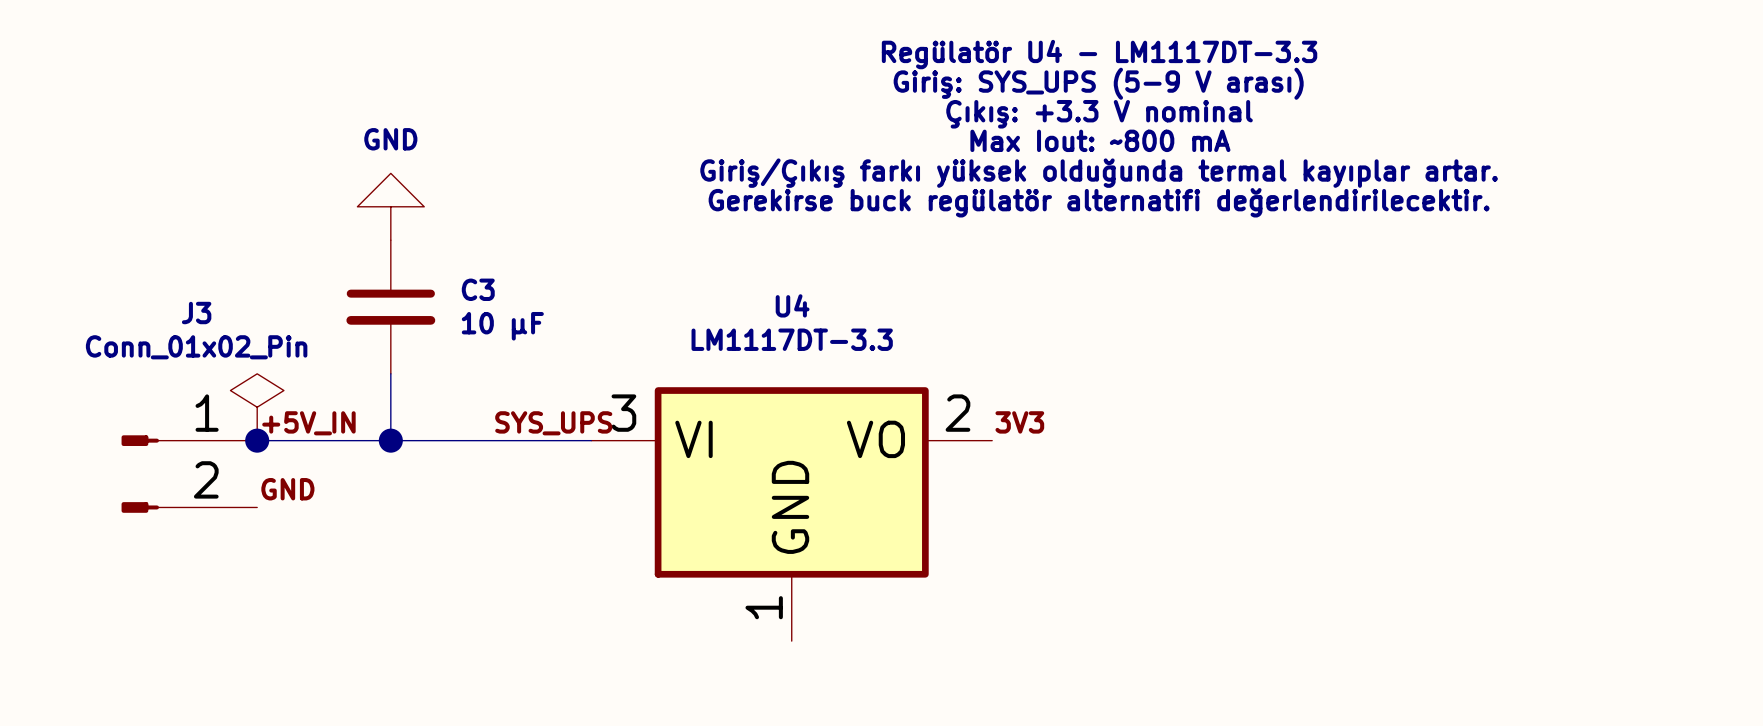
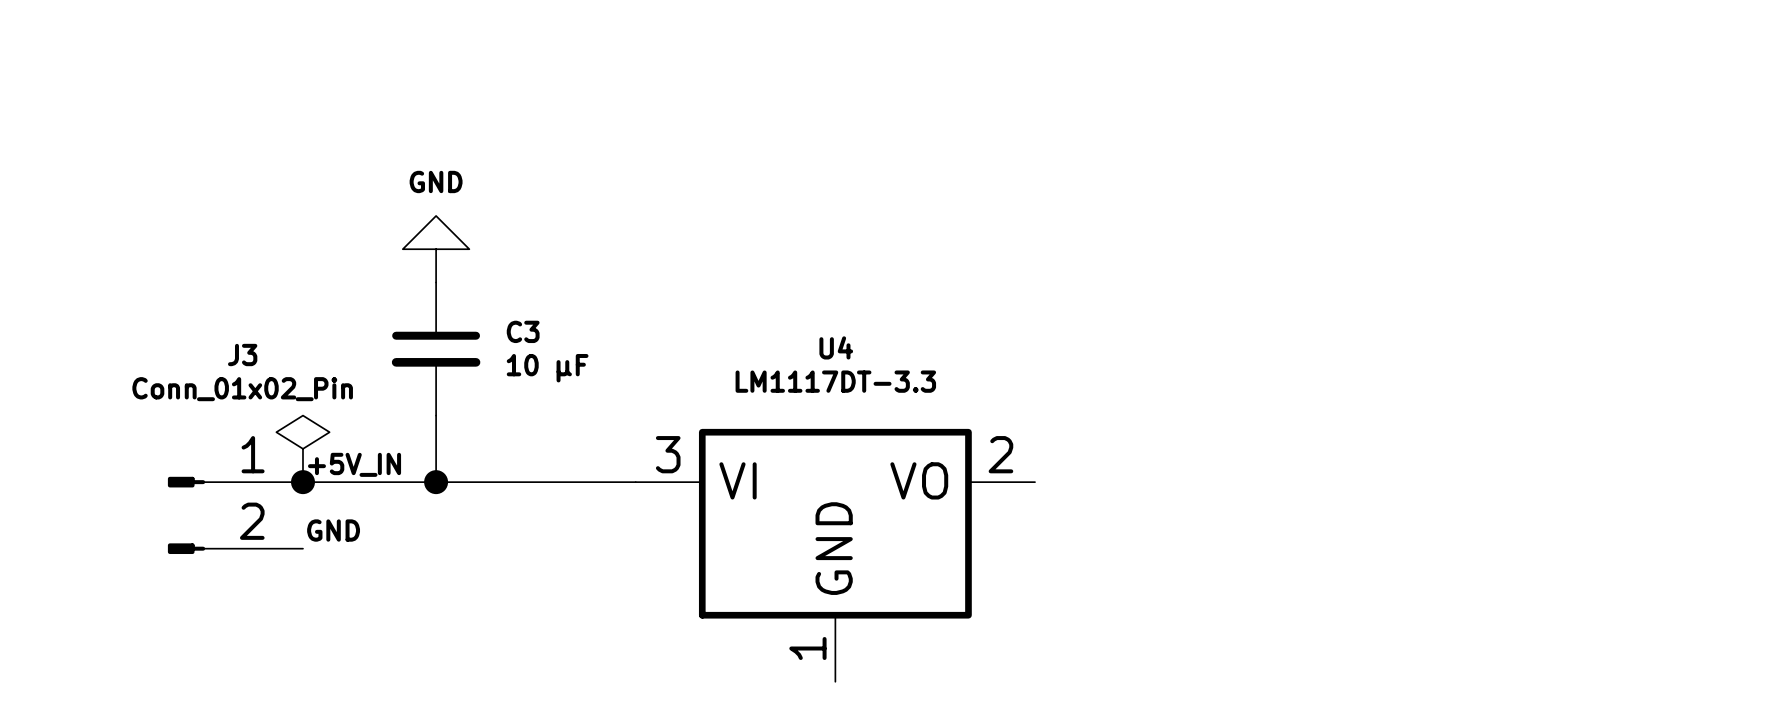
text: Regülatör U4 - LM1117DT-3.3 (1099, 54) -> none
text: Giriş: SYS_UPS (5-9 V arası) (1098, 83) -> none
text: Çıkış: +3.3 V nominal (1099, 114) -> none
text: Max Iout: ~800 mA (1100, 140) -> none
text: Giriş/Çıkış farkı yüksek olduğunda termal kayıplar artar. (1099, 173) -> none
text: Gerekirse buck regülatör alternatifi değerlendirilecektir. (1099, 202) -> none
label: 3V3 (1019, 422) -> none
label: SYS_UPS (553, 423) -> none

